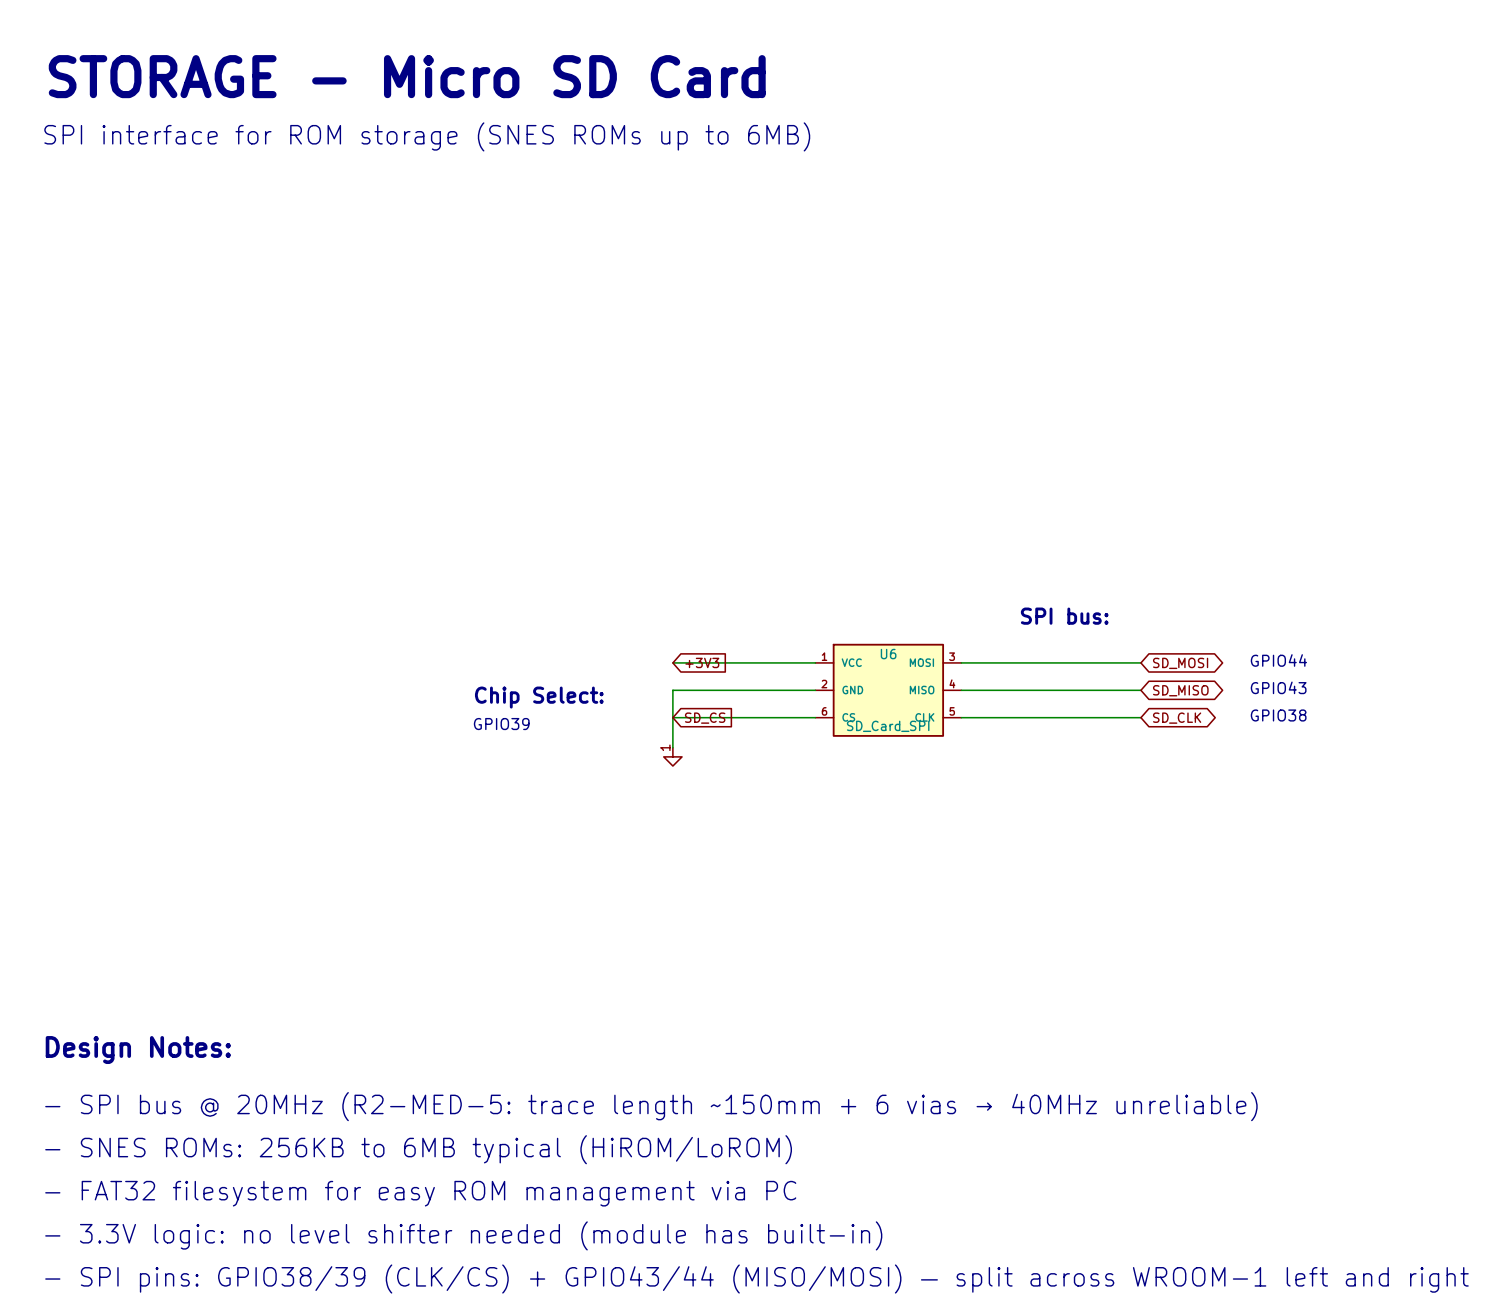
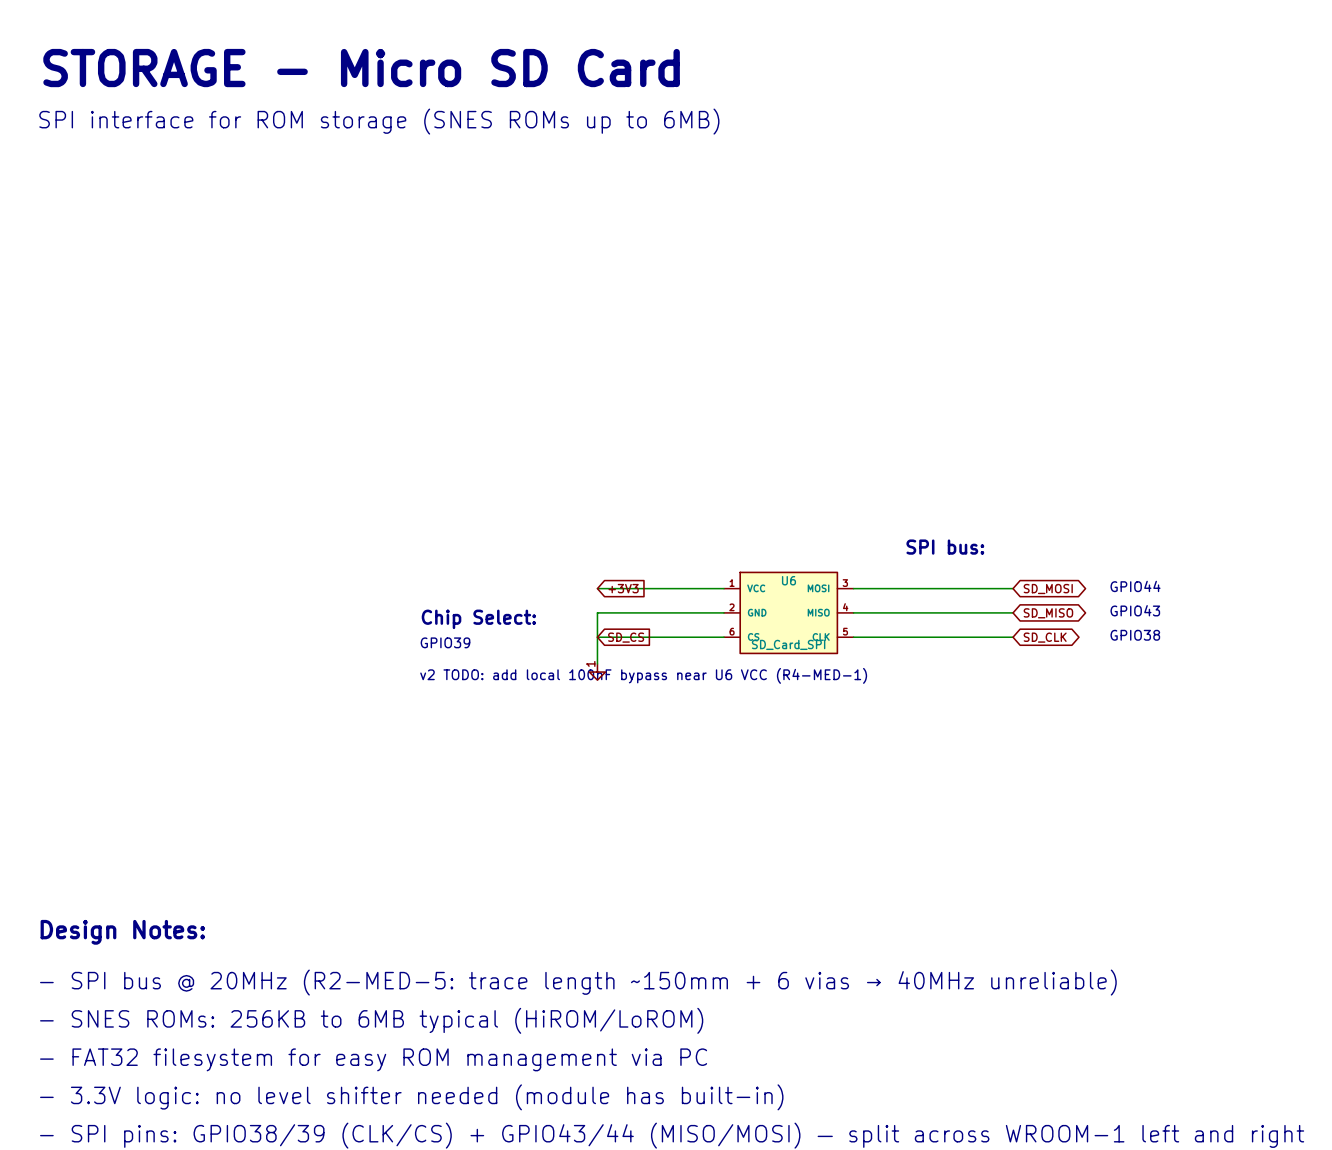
text: none -> v2 TODO: add local 100nF bypass near U6 VCC (R4-MED-1) (643, 675)

